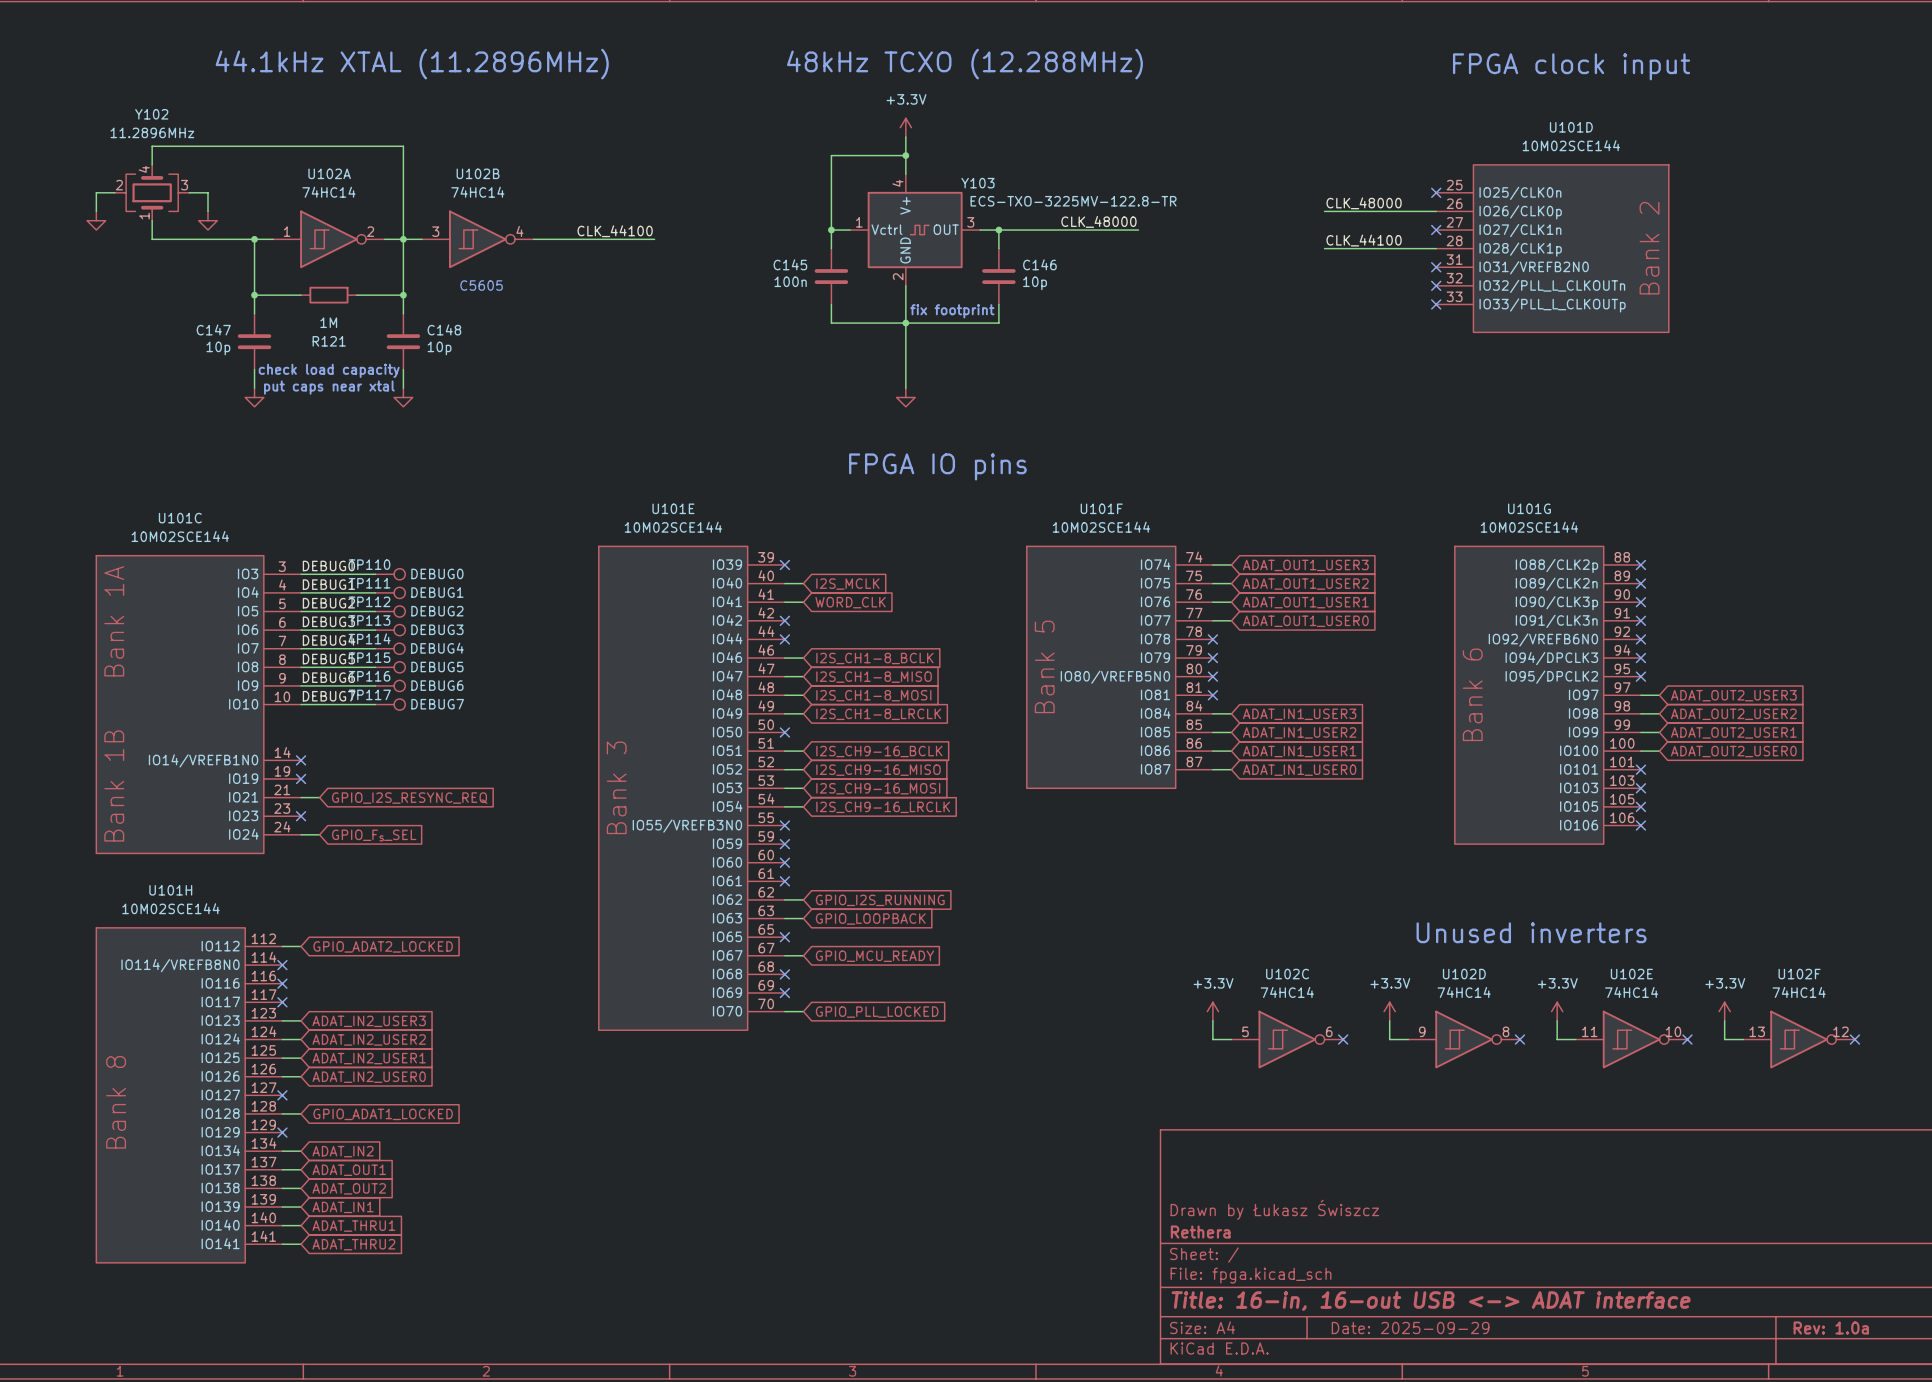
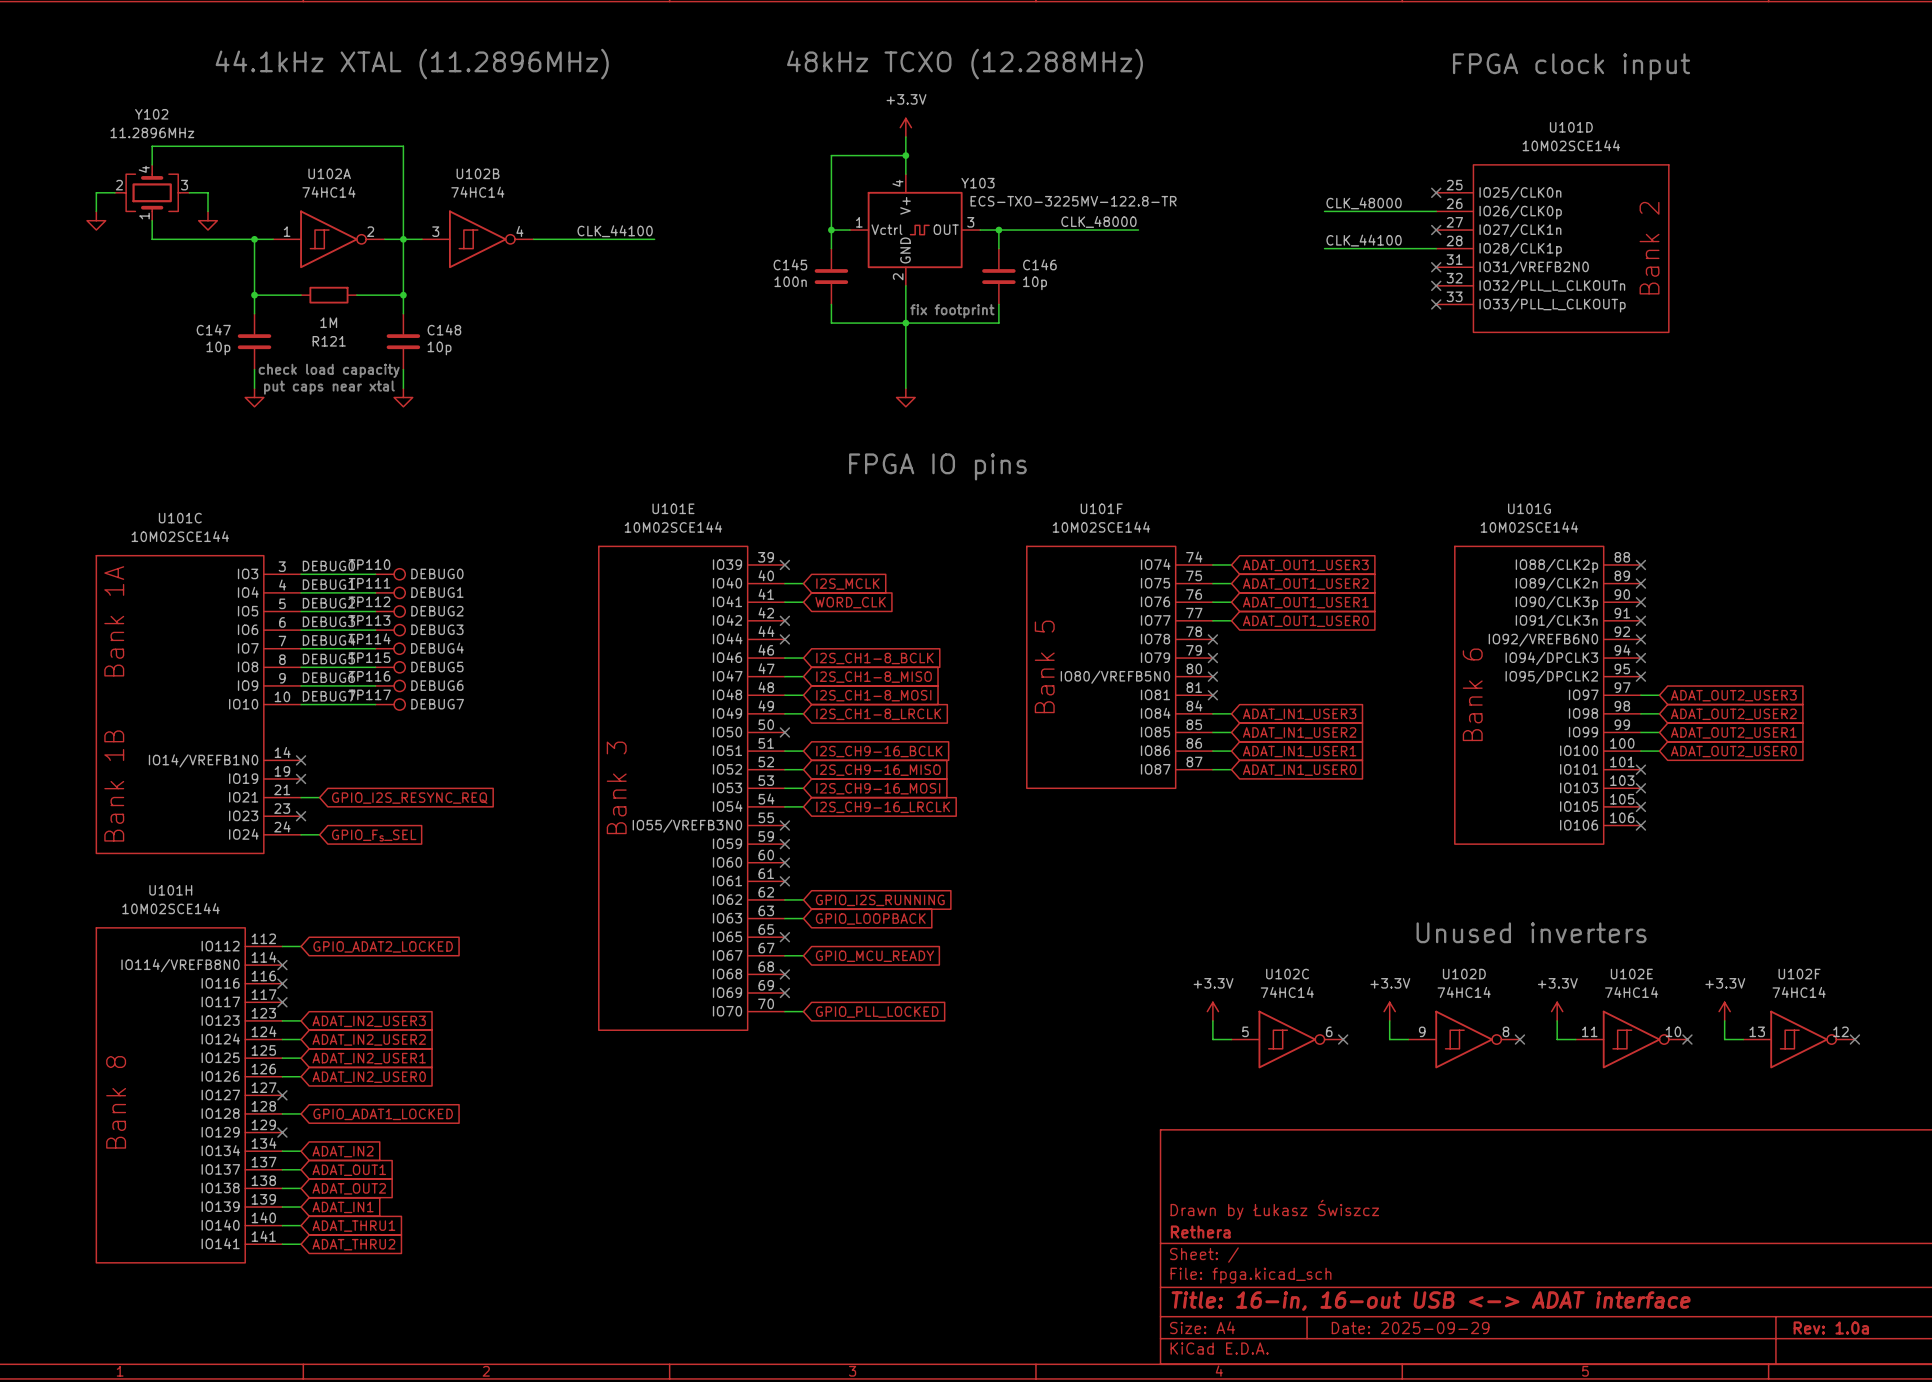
text: C5605 (481, 285) -> none

